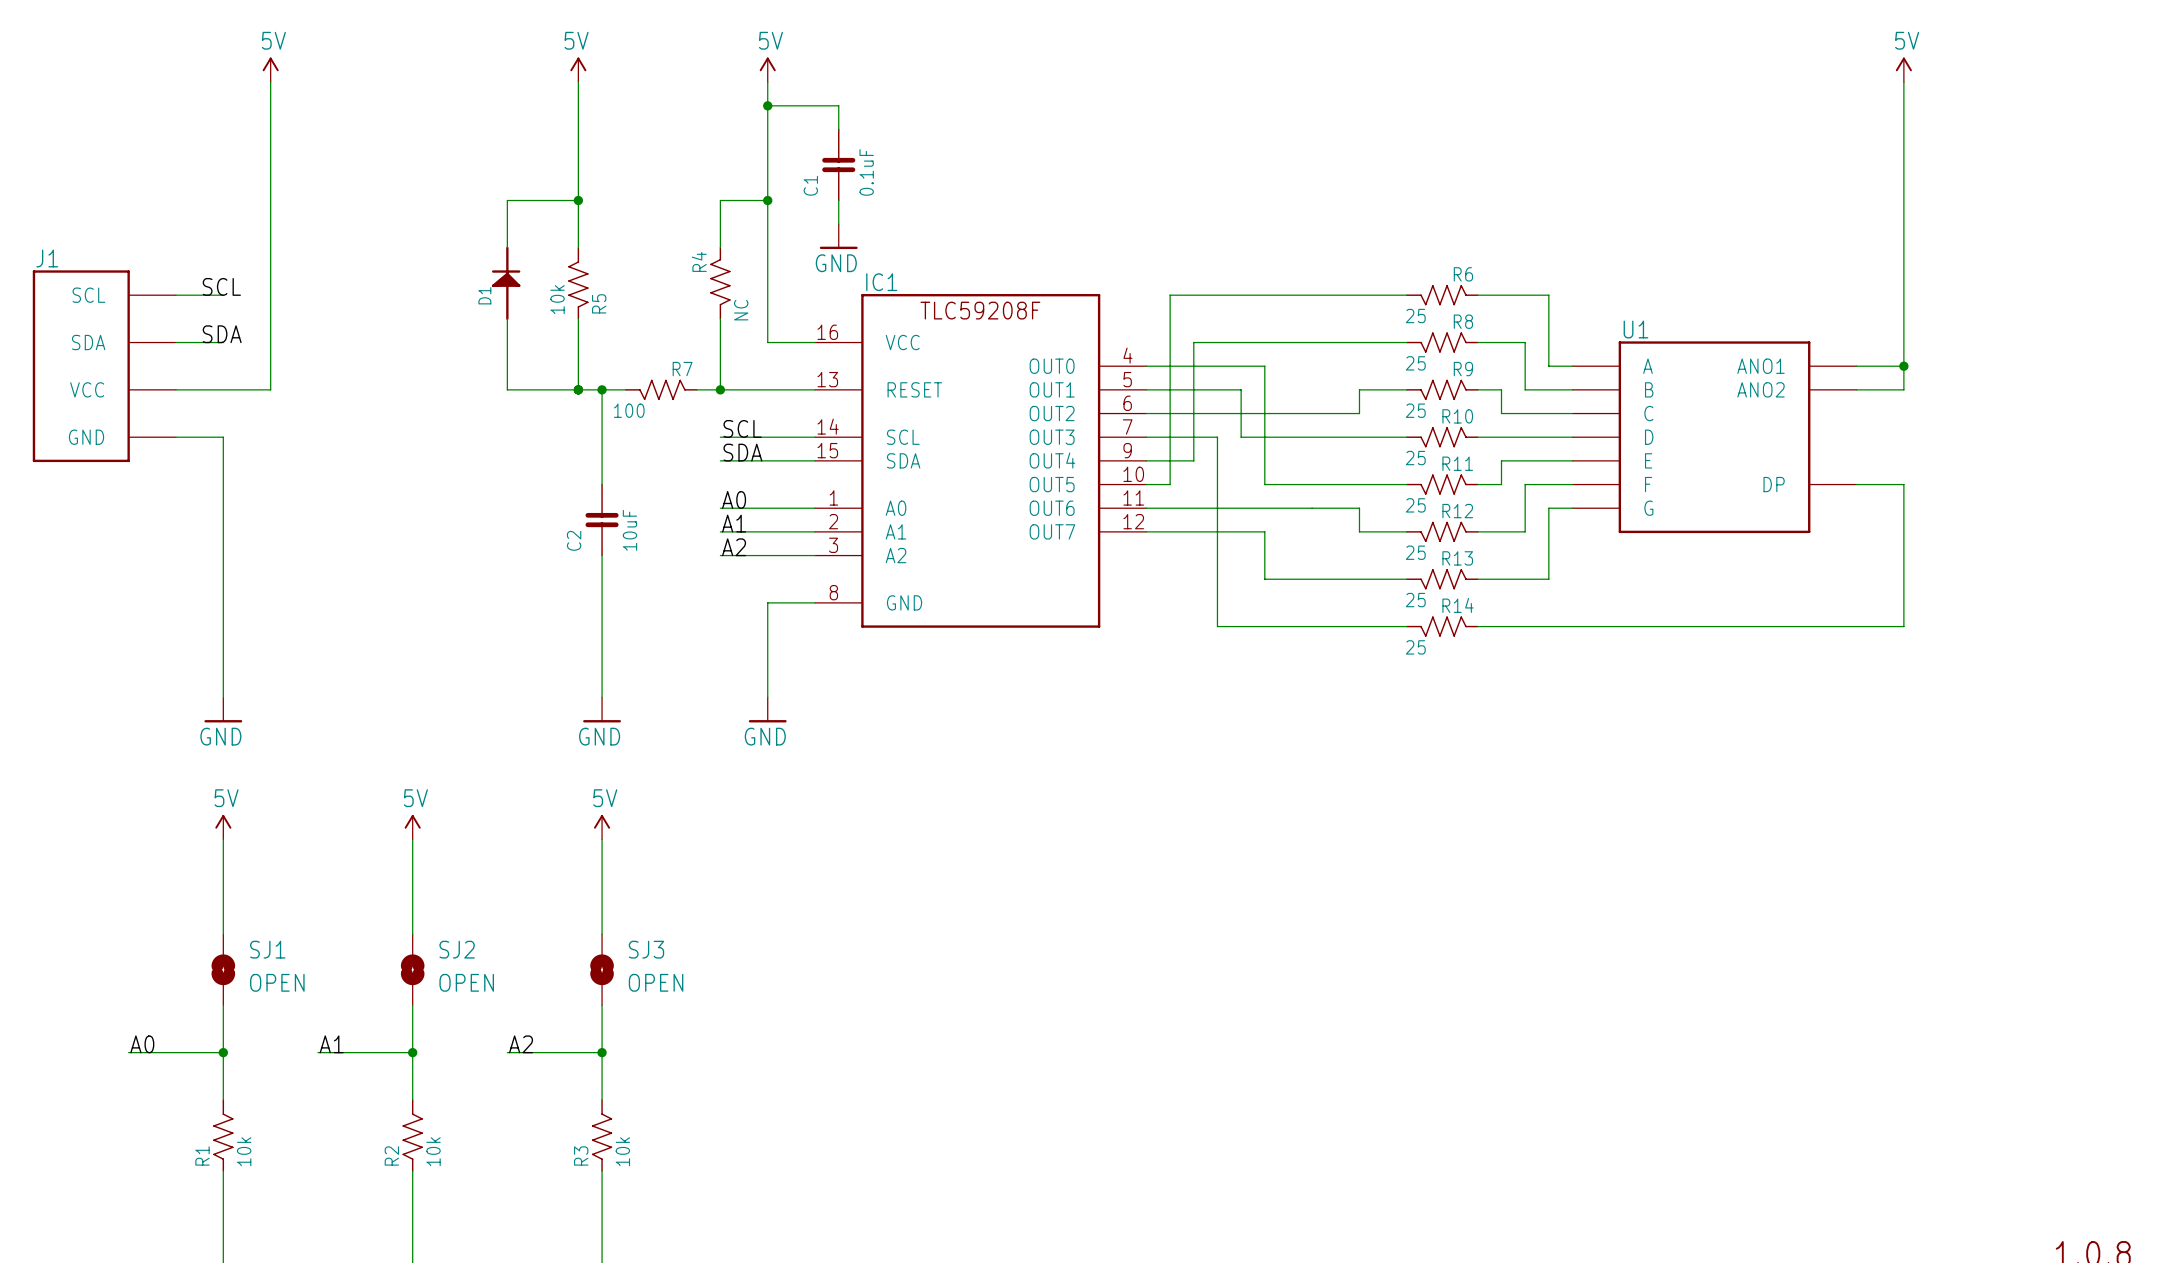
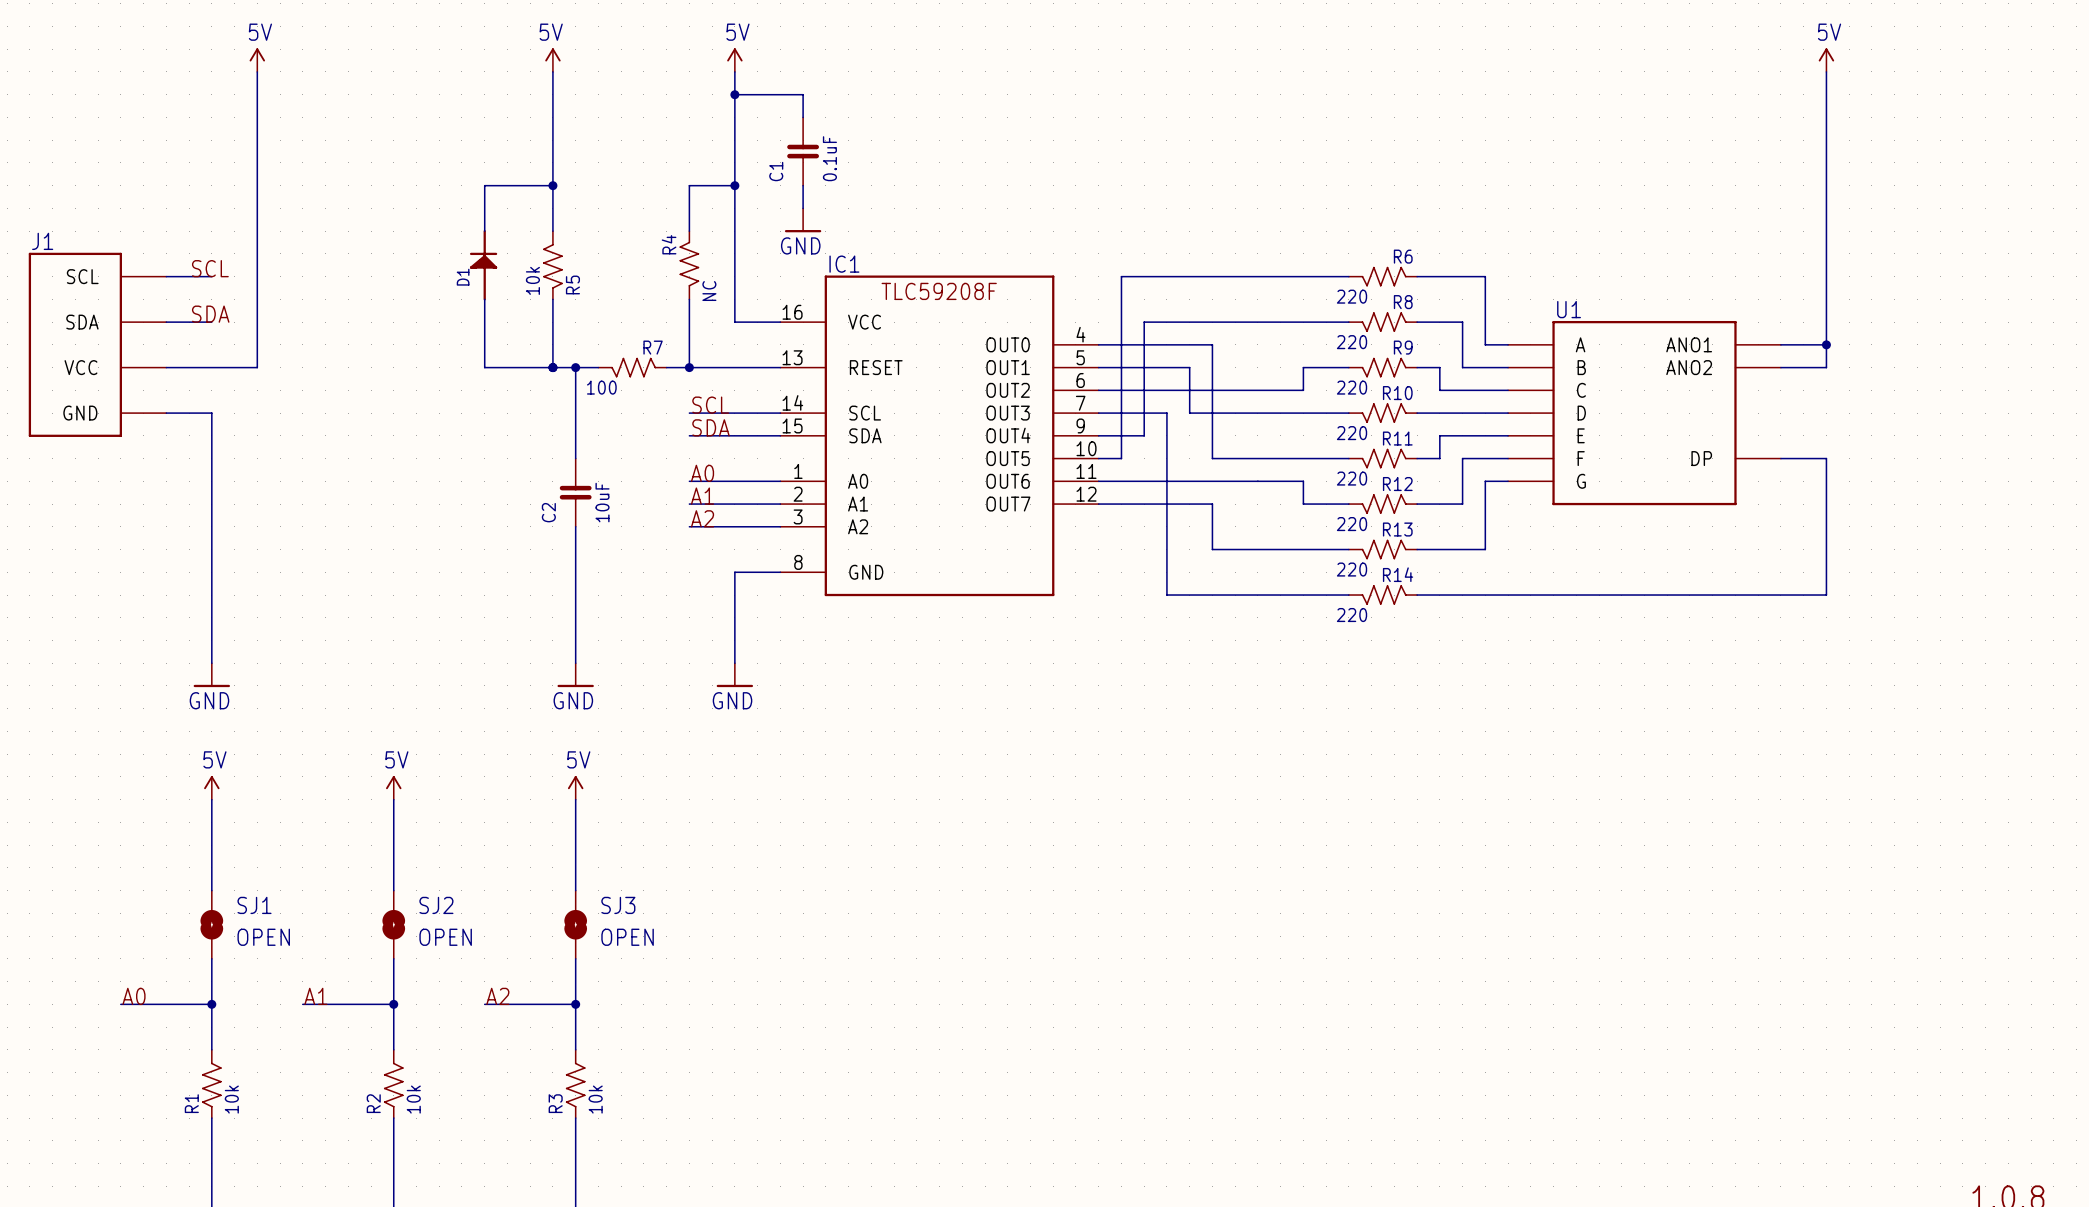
R6 value: 25 (1415, 316) -> 220 (1352, 296)
R8 value: 25 (1415, 363) -> 220 (1352, 342)
R9 value: 25 (1415, 410) -> 220 (1352, 387)
R10 value: 25 (1415, 458) -> 220 (1352, 433)
R11 value: 25 (1415, 505) -> 220 (1352, 478)
R12 value: 25 (1415, 552) -> 220 (1352, 524)
R13 value: 25 (1415, 600) -> 220 (1352, 569)
R14 value: 25 (1415, 647) -> 220 (1352, 615)

